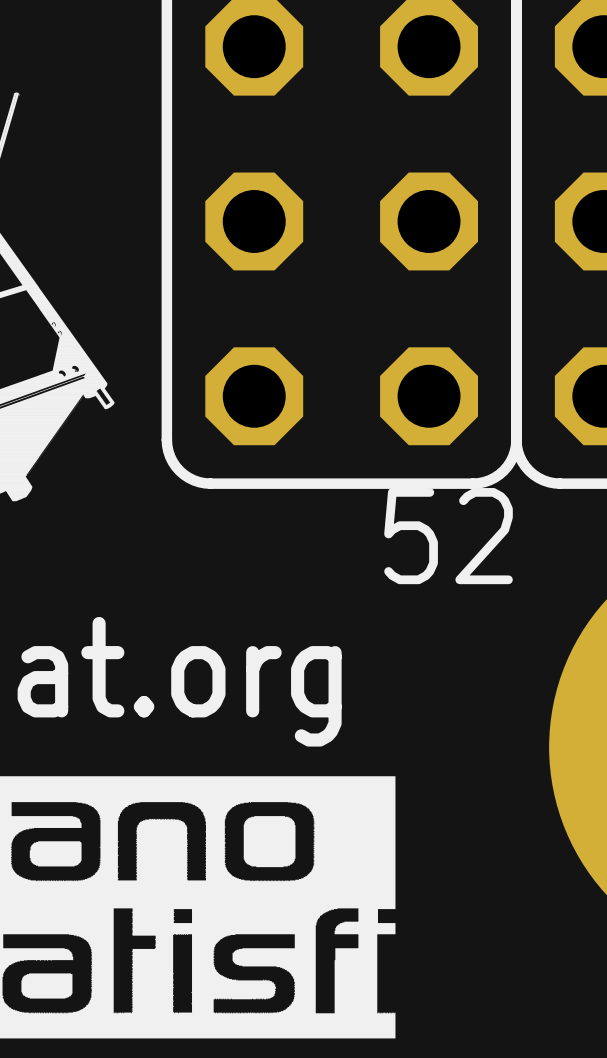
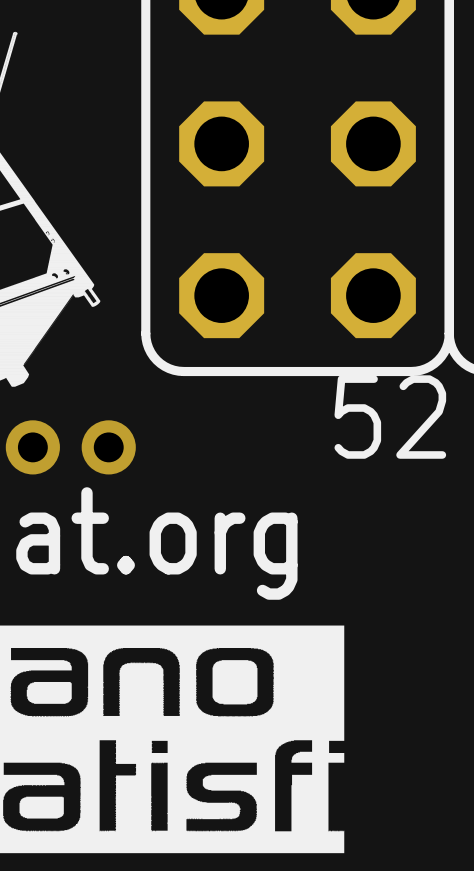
via: none -> (32, 447)
via: none -> (108, 447)

